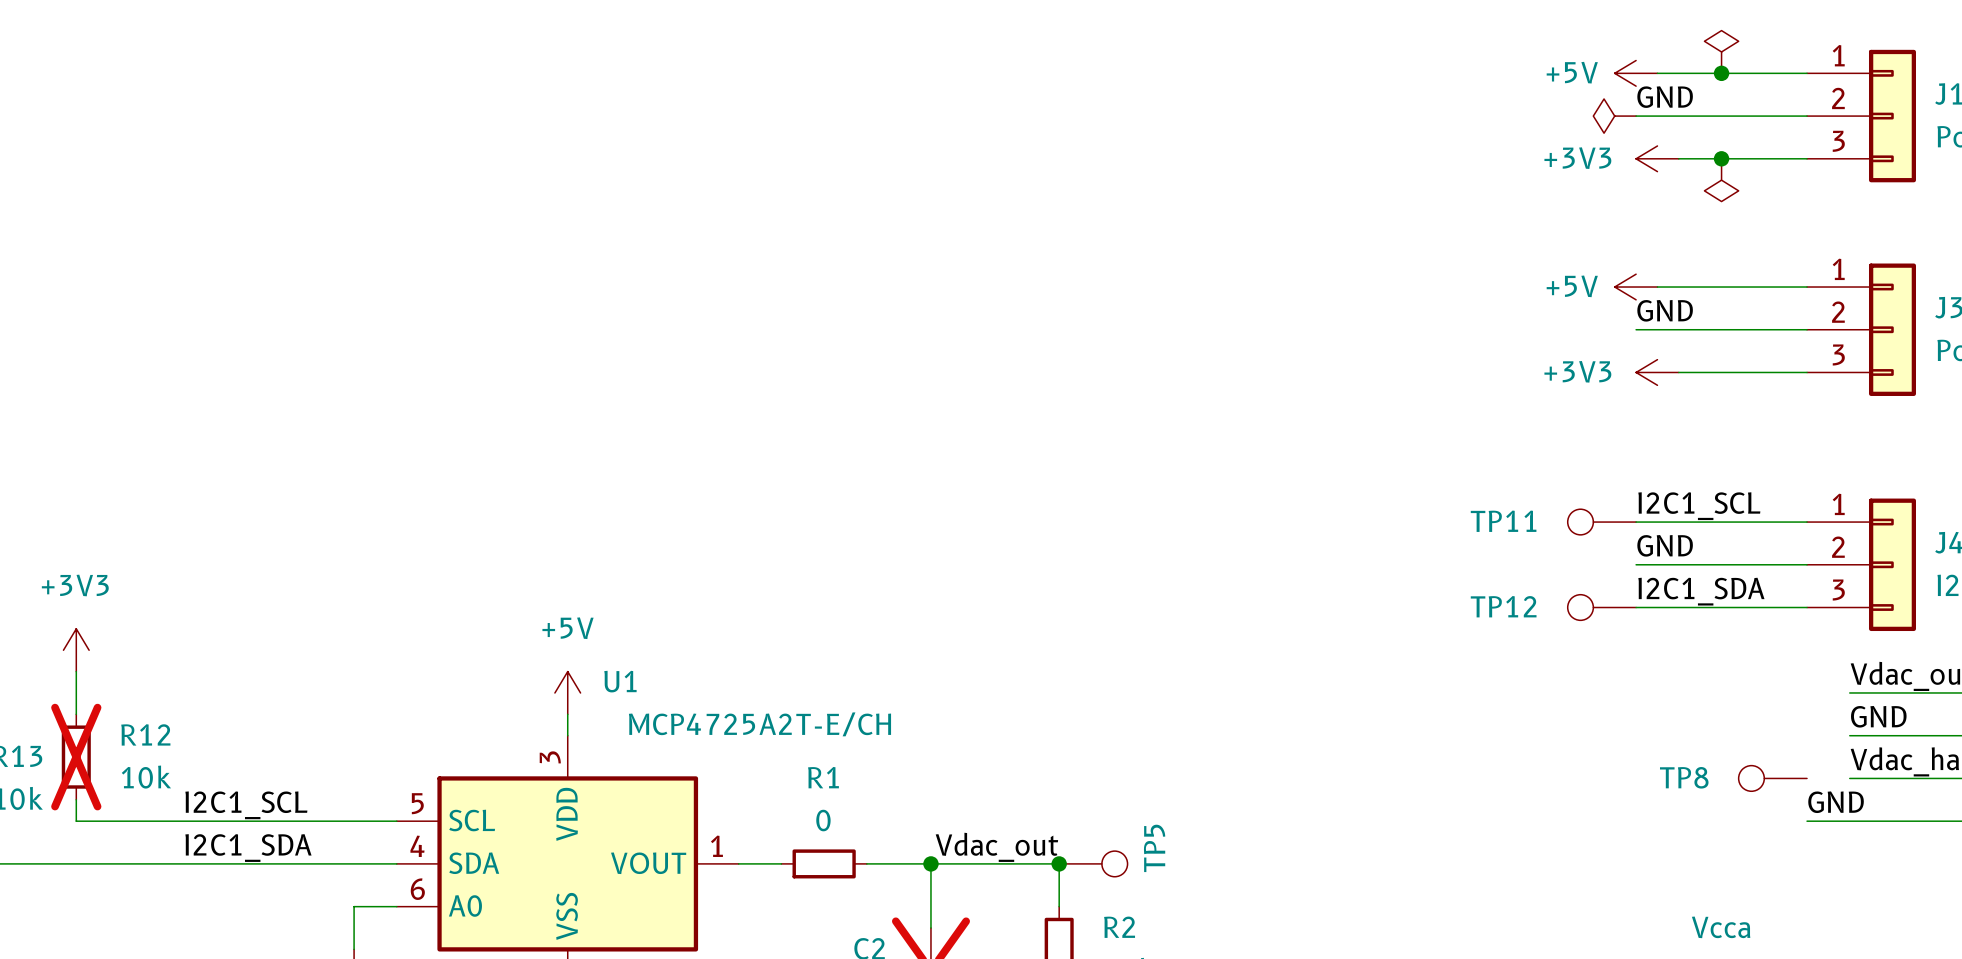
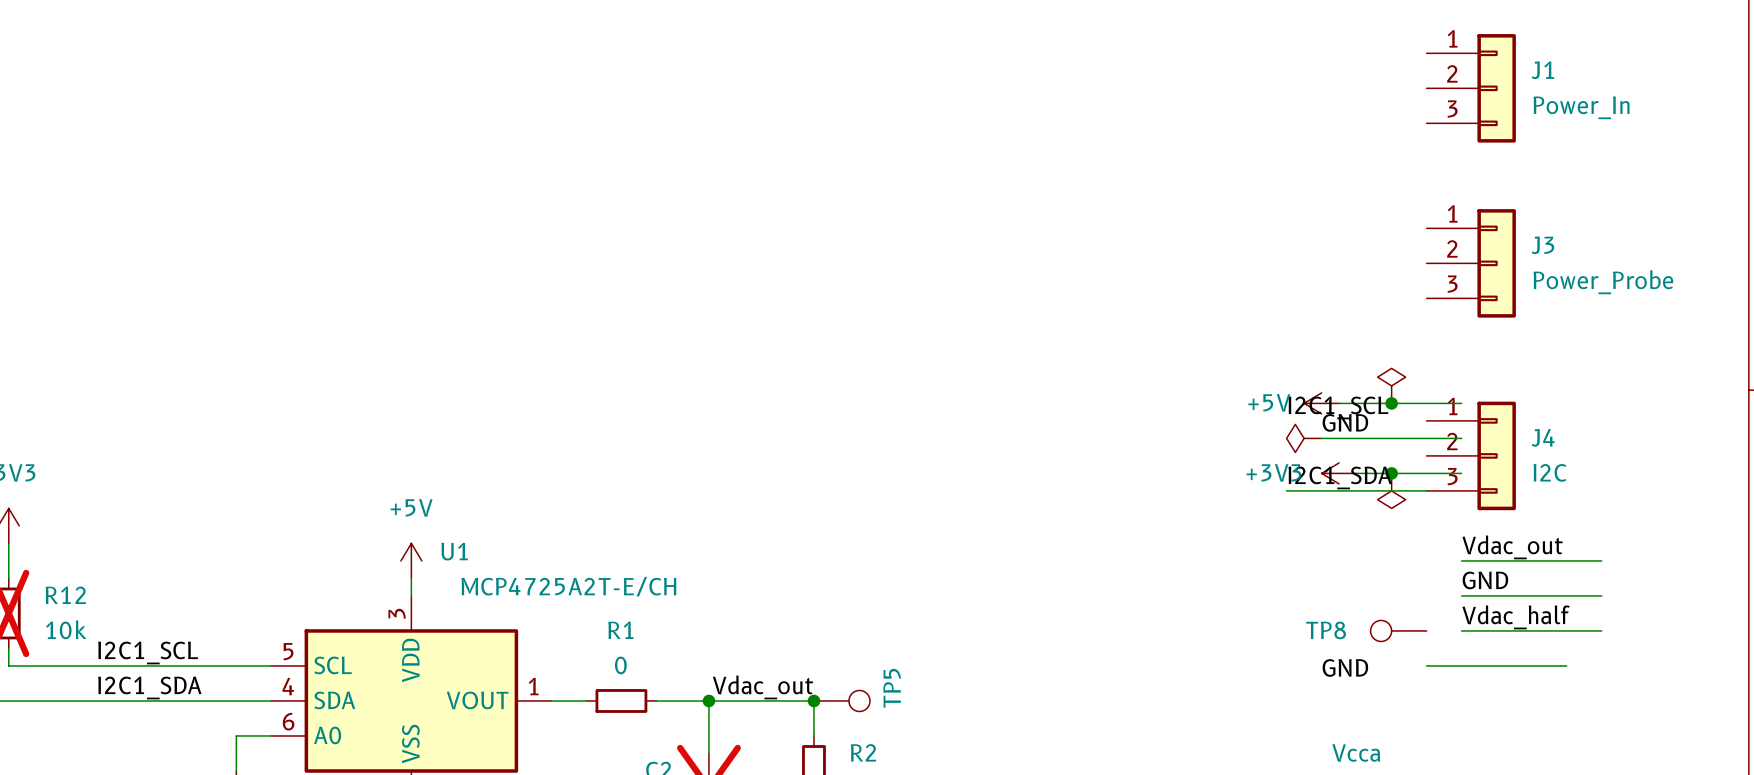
power symbol: (1721, 51) -> none
power symbol: +5V (1636, 73) -> none
wire: (1657, 73) (1807, 73) -> none
junction: (1721, 73) -> none
label: GND (1665, 97) -> none
power symbol: (1614, 116) -> none
wire: (1636, 116) (1807, 116) -> none
power symbol: +3V3 (1657, 158) -> none
wire: (1678, 158) (1807, 158) -> none
junction: (1721, 158) -> none
power symbol: (1721, 180) -> none
power symbol: +5V (1636, 287) -> none
wire: (1657, 287) (1807, 287) -> (1339, 403) (1461, 403)
label: GND (1665, 310) -> none
wire: (1636, 329) (1807, 329) -> (1321, 438) (1461, 438)
power symbol: +3V3 (1657, 372) -> none
wire: (1678, 372) (1807, 372) -> (1356, 473) (1461, 473)
power symbol: none -> (1391, 385)
power symbol: none -> +5V (1321, 403)
junction: none -> (1391, 403)
TP11: (1601, 522) -> none
wire: (1636, 522) (1807, 522) -> none
power symbol: none -> (1304, 438)
label position: GND (1665, 545) -> GND (1345, 422)
wire: (1636, 564) (1807, 564) -> none
power symbol: none -> +3V3 (1339, 473)
junction: none -> (1391, 473)
TP12: (1601, 607) -> none
power symbol: none -> (1391, 490)
label position: GND (1836, 802) -> GND (1345, 667)

